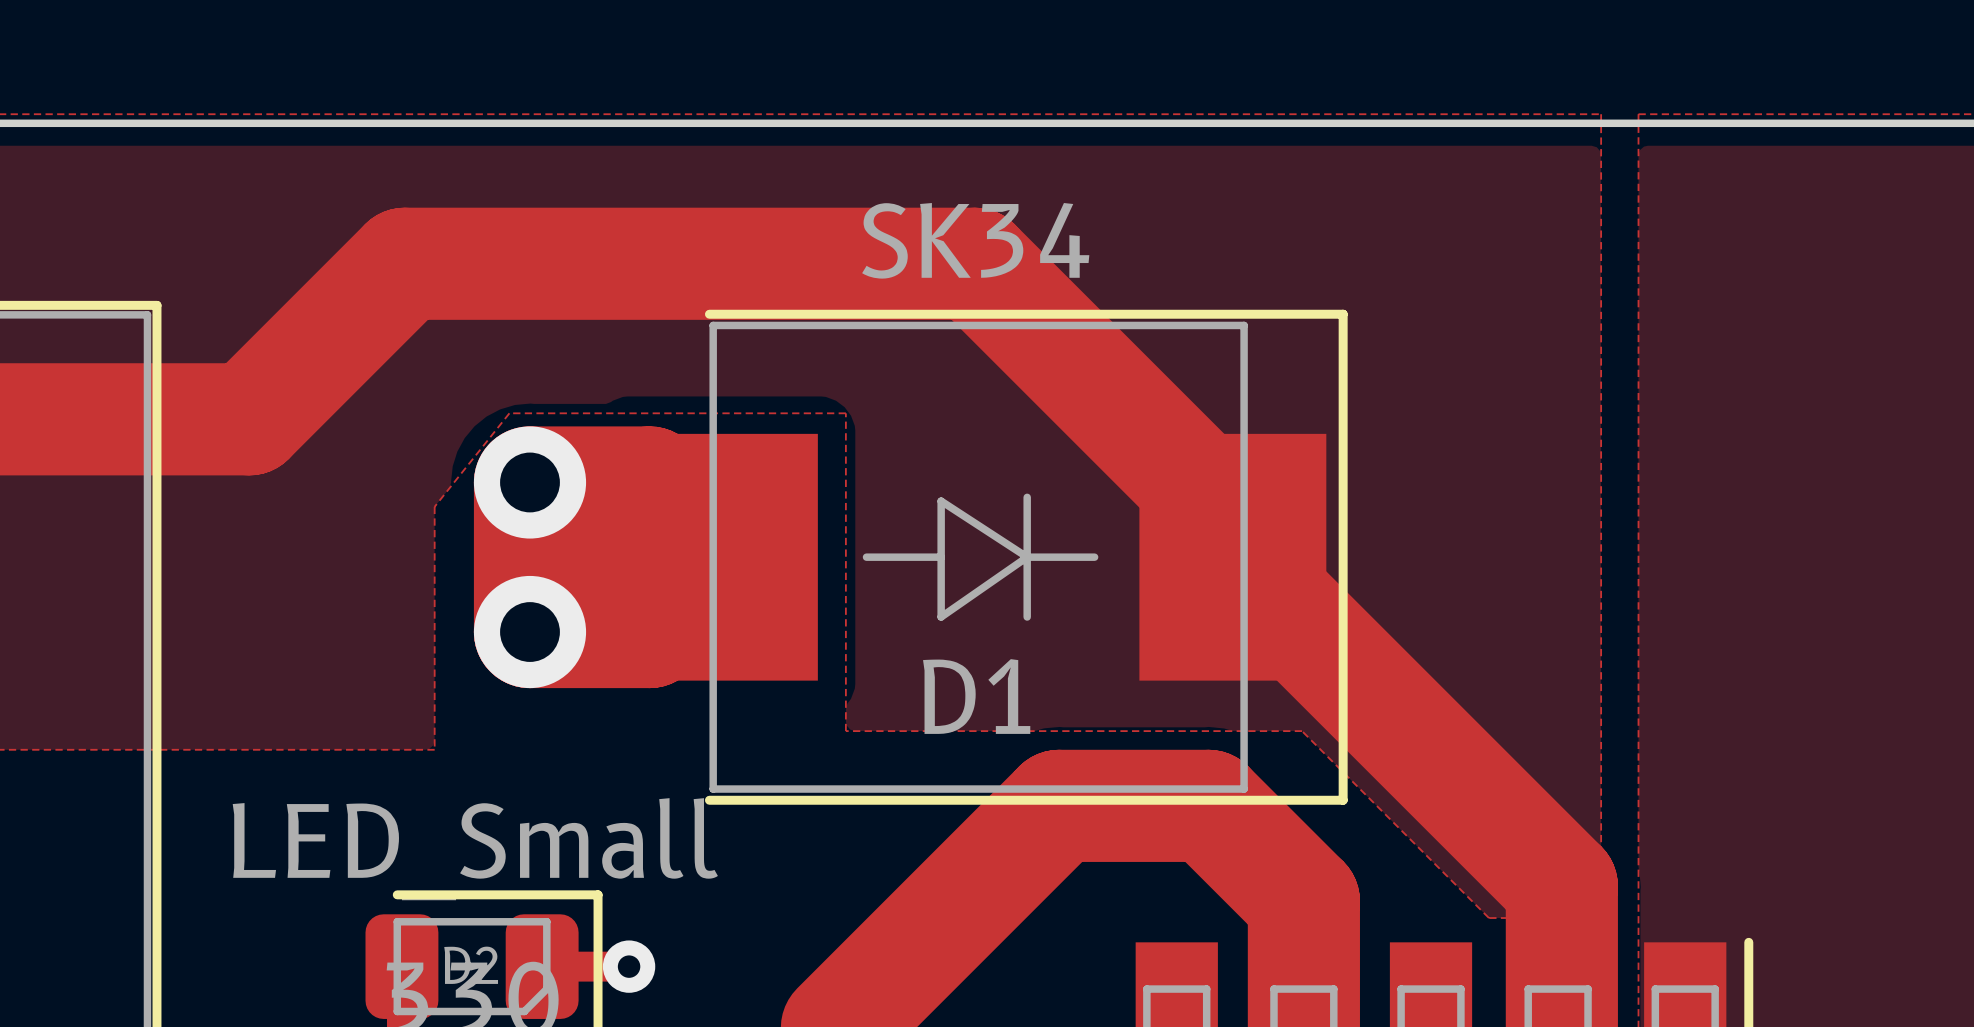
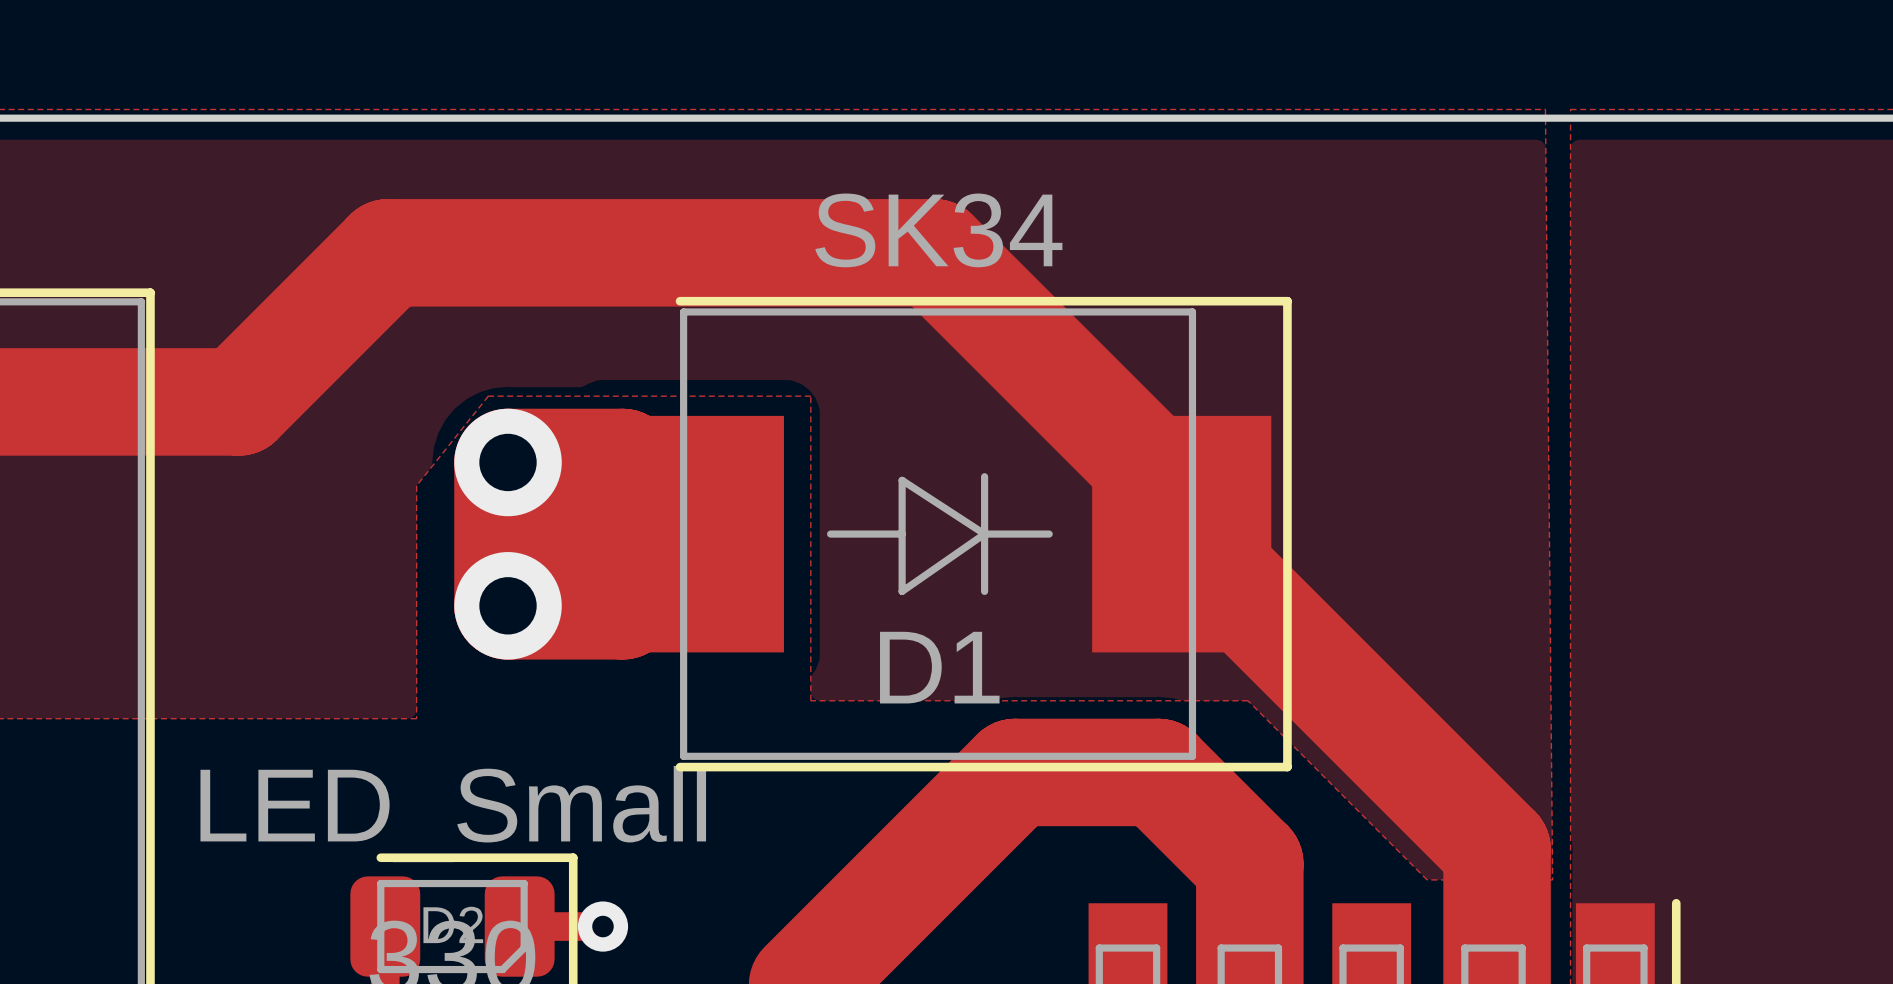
zone outline: (1601, 114) (1601, 918) -> (1534, 109) (1545, 109) (1552, 879) (1534, 879)

